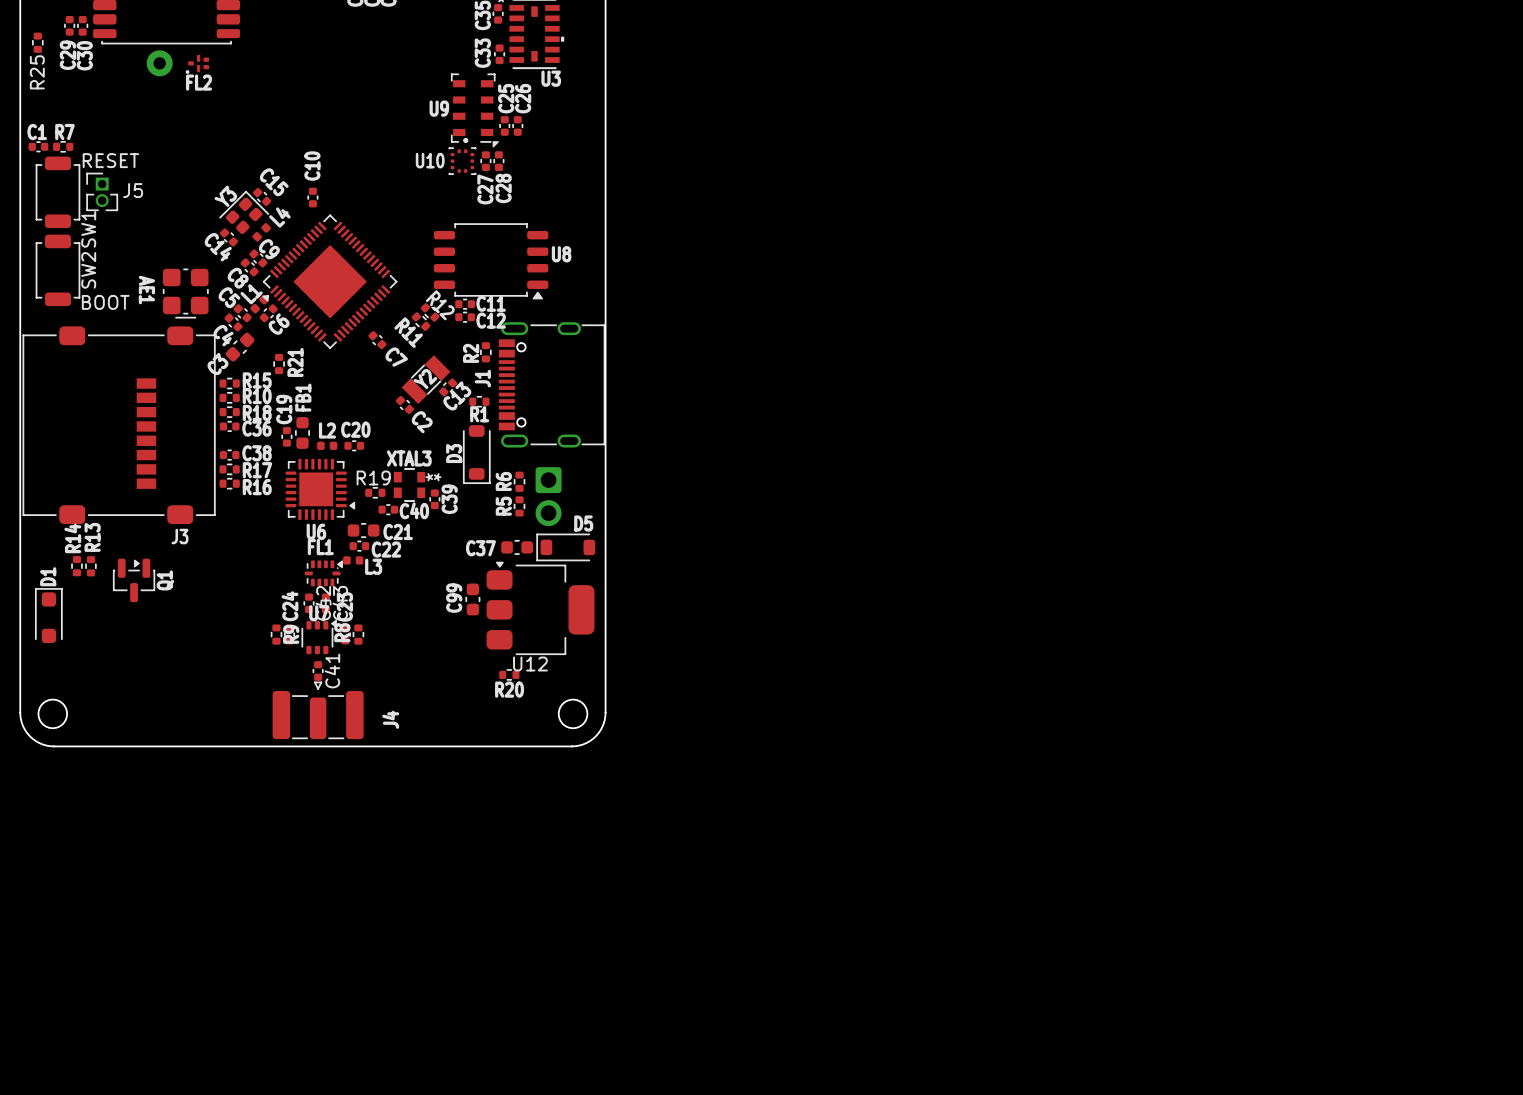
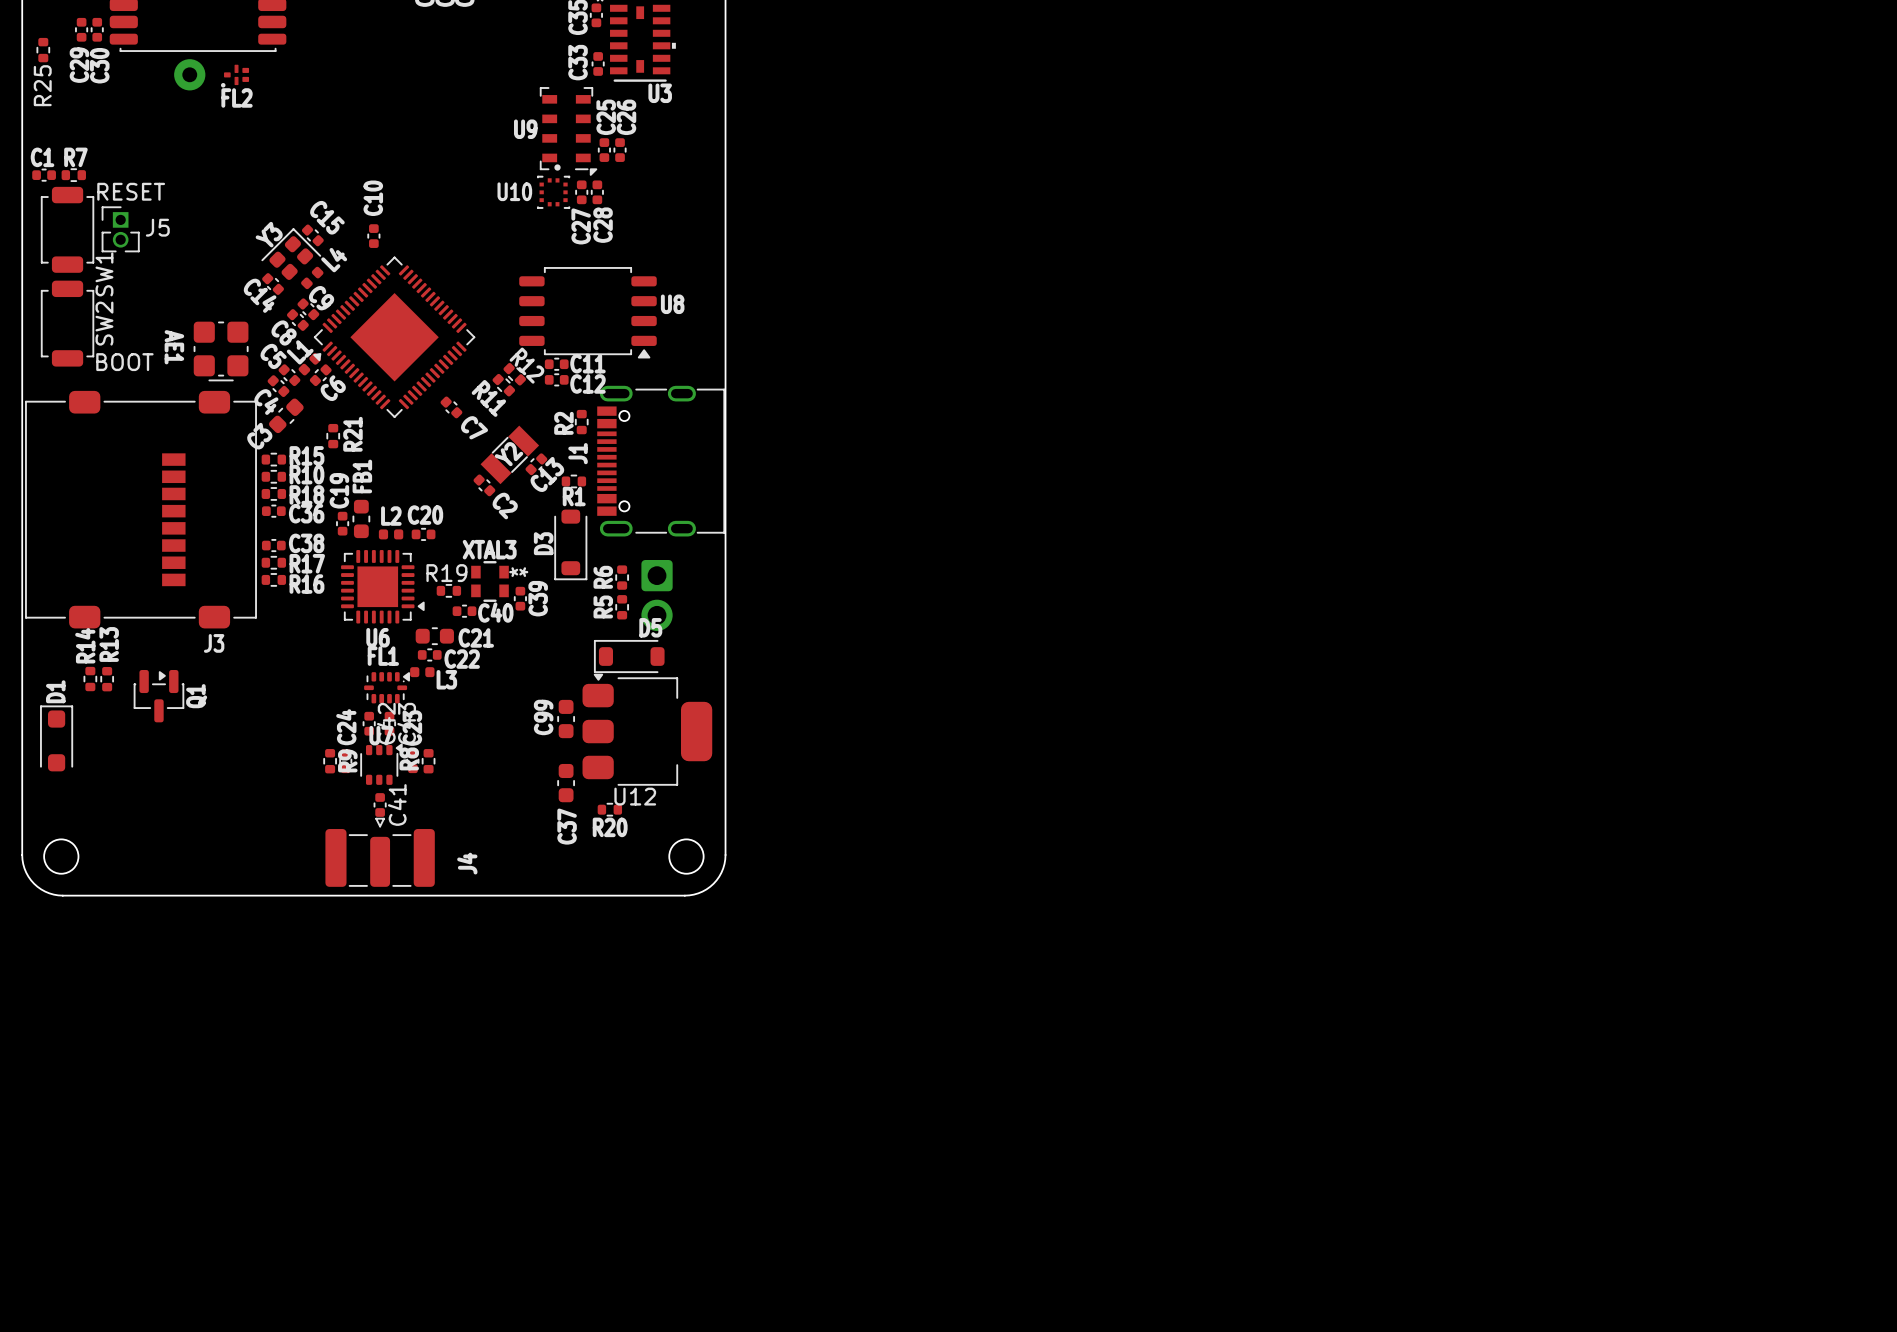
C37 rotation: 0° (517, 547) -> 90° clockwise (566, 783)
C37 position: (517, 547) -> (566, 783)
D5 position: (565, 547) -> (629, 656)
C37 name position: C37 (480, 548) -> C37 (567, 826)

